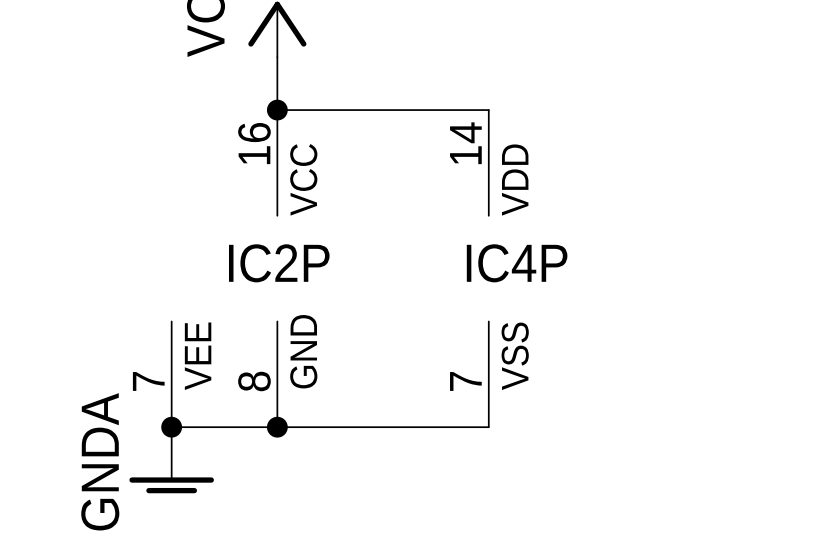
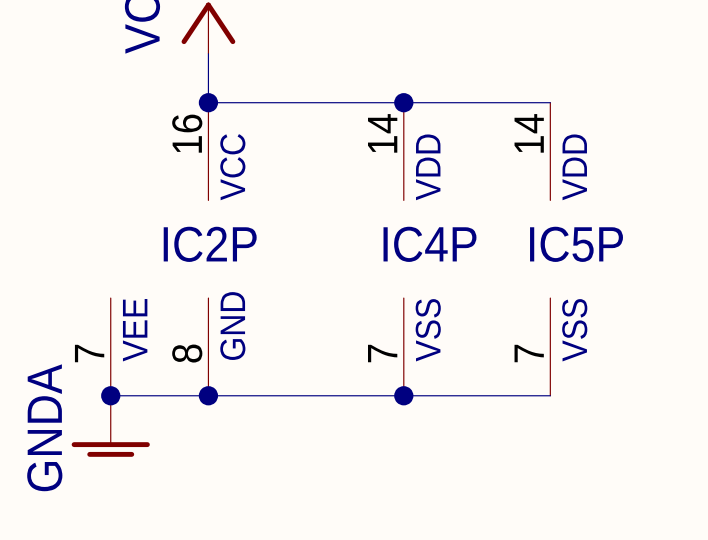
wire: none -> (403, 102) (550, 102)
junction: none -> (403, 102)
IC5P: none -> (550, 249)
wire: none -> (403, 395) (550, 395)
junction: none -> (403, 395)

